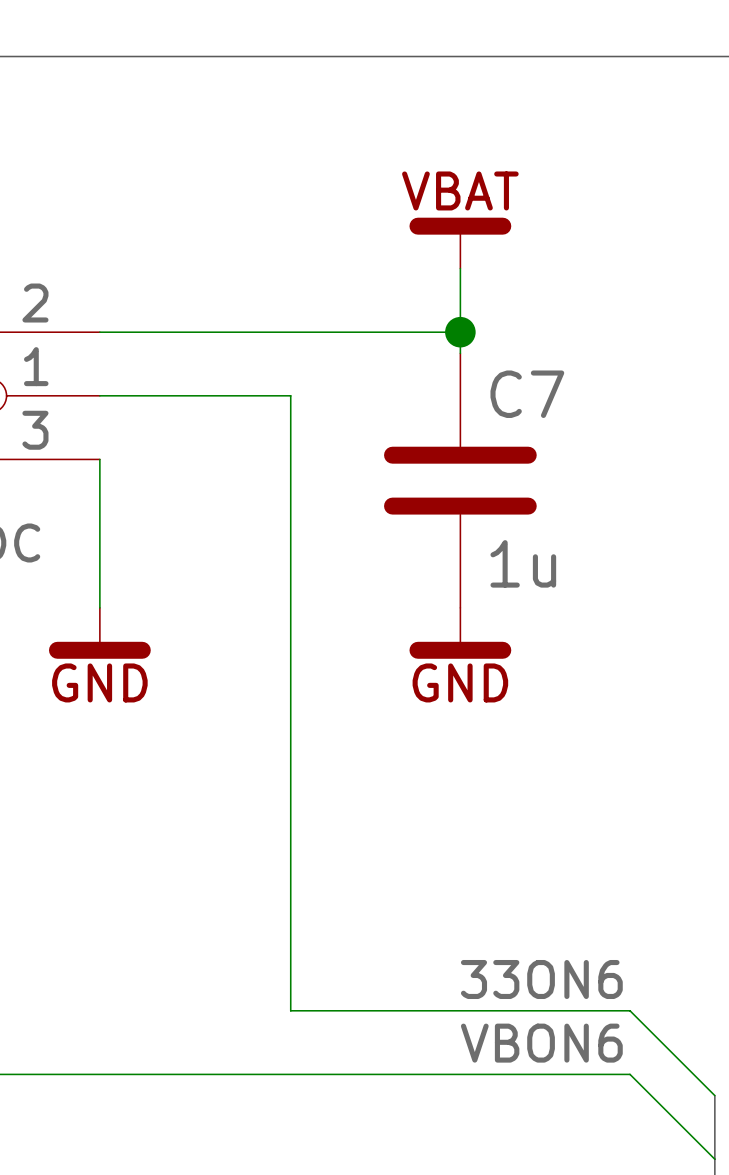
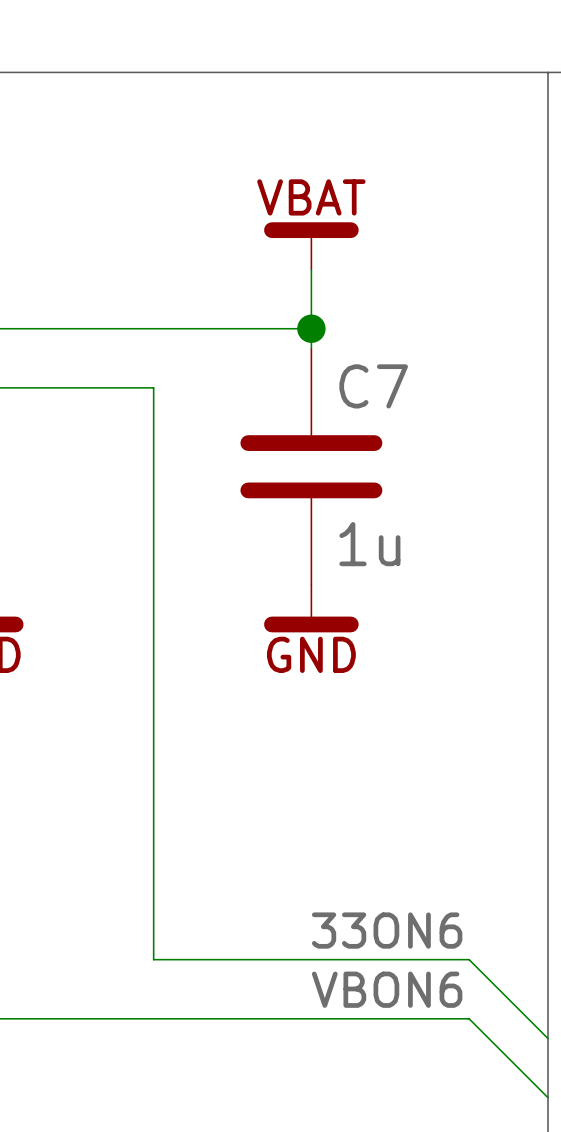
bus: none -> (547, 72) (547, 1038)

